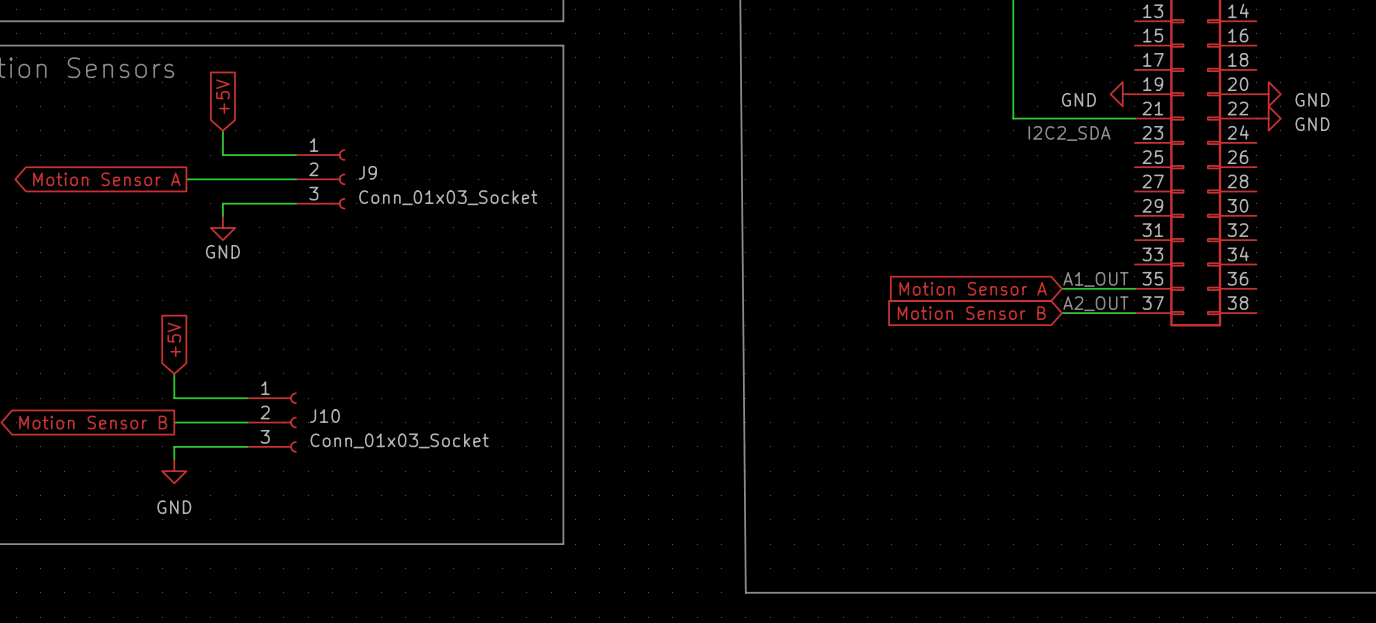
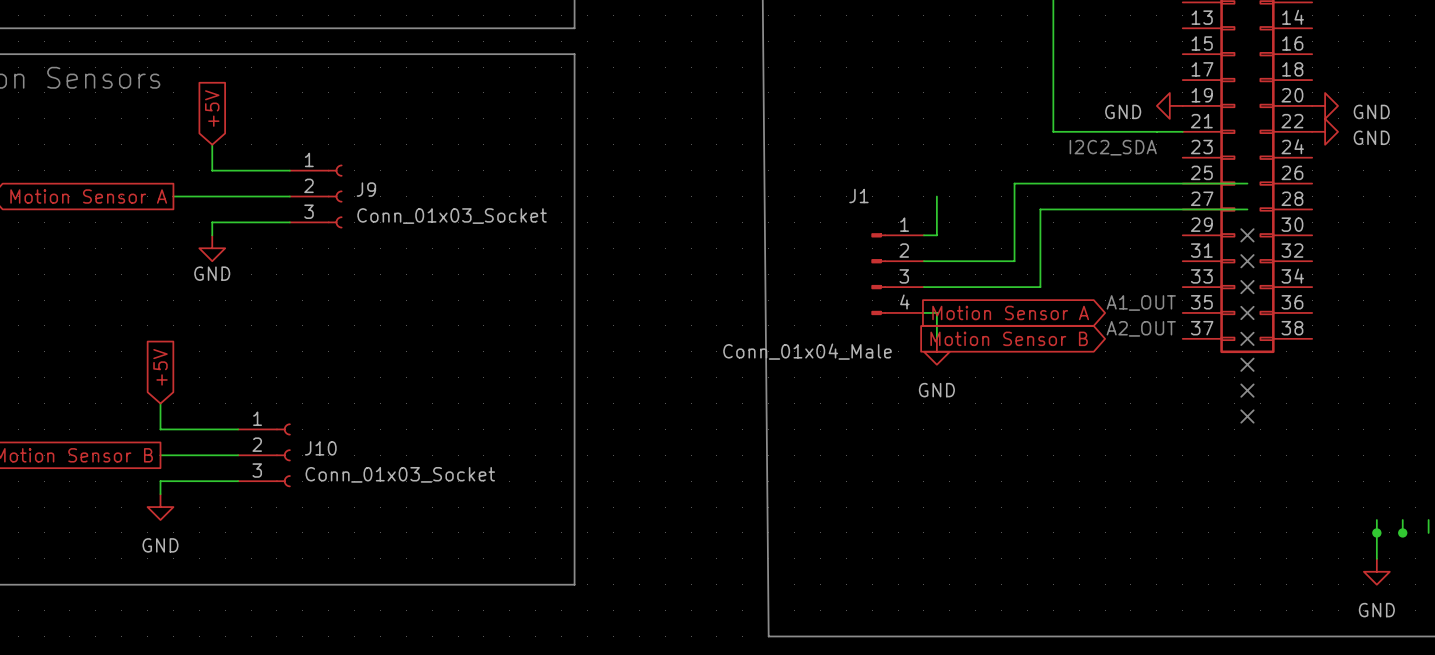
wire: none -> (1247, 183) (1014, 183) (1014, 261) (923, 261)
wire: none -> (936, 196) (936, 235) (923, 235)
wire: none -> (1247, 209) (1040, 209) (1040, 287) (923, 287)
no-connect mark: none -> (1247, 235)
no-connect mark: none -> (1247, 261)
J1: none -> Conn_01x04_Male (897, 274)
no-connect mark: none -> (1247, 287)
wire: none -> (923, 312) (936, 312) (936, 338)
wire: (1061, 288) (1134, 288) -> none
no-connect mark: none -> (1247, 312)
wire: (1061, 313) (1134, 313) -> none
no-connect mark: none -> (1247, 338)
power symbol: none -> GND (936, 351)
no-connect mark: none -> (1247, 364)
no-connect mark: none -> (1247, 390)
no-connect mark: none -> (1247, 416)
wire: none -> (1376, 520) (1376, 558)
wire: none -> (1402, 520) (1402, 532)
wire: none -> (1428, 520) (1428, 532)
junction: none -> (1376, 532)
junction: none -> (1402, 532)
power symbol: none -> GND (1376, 571)

